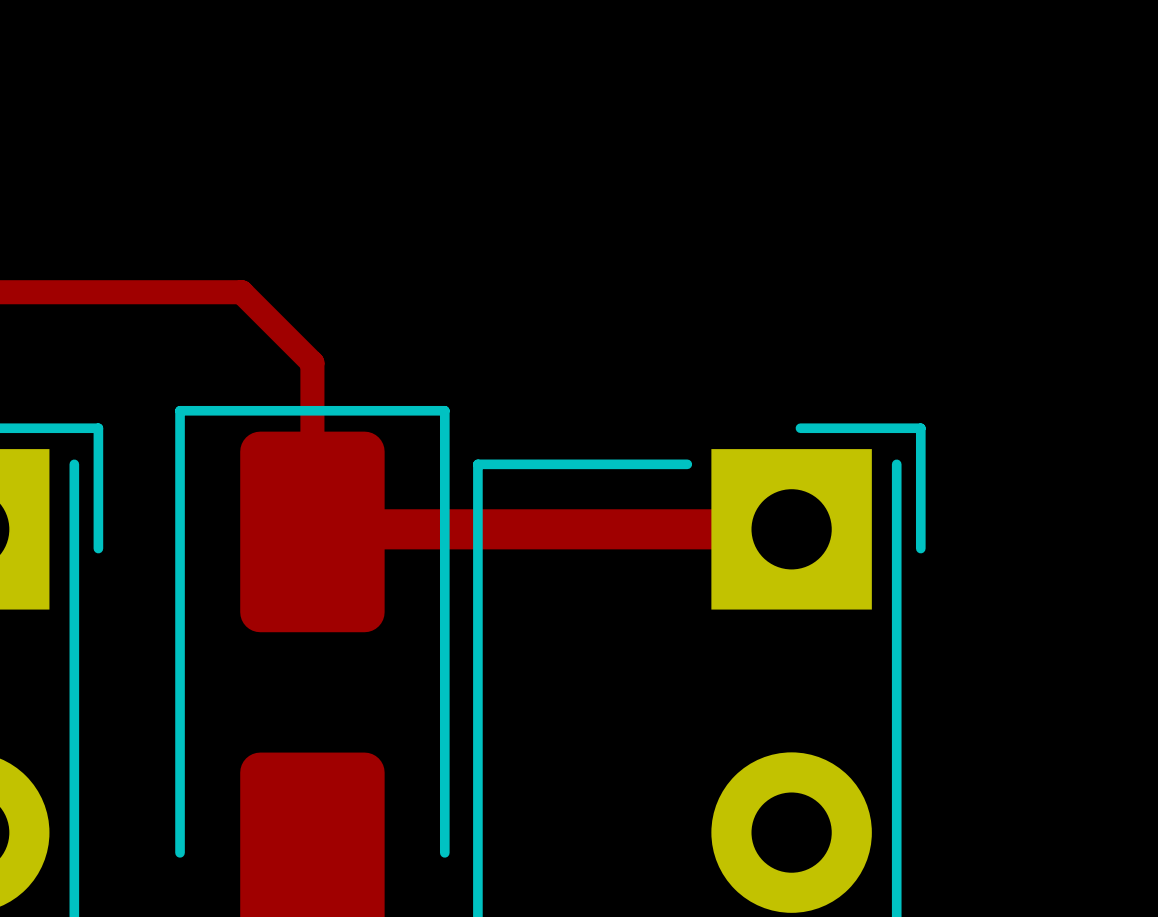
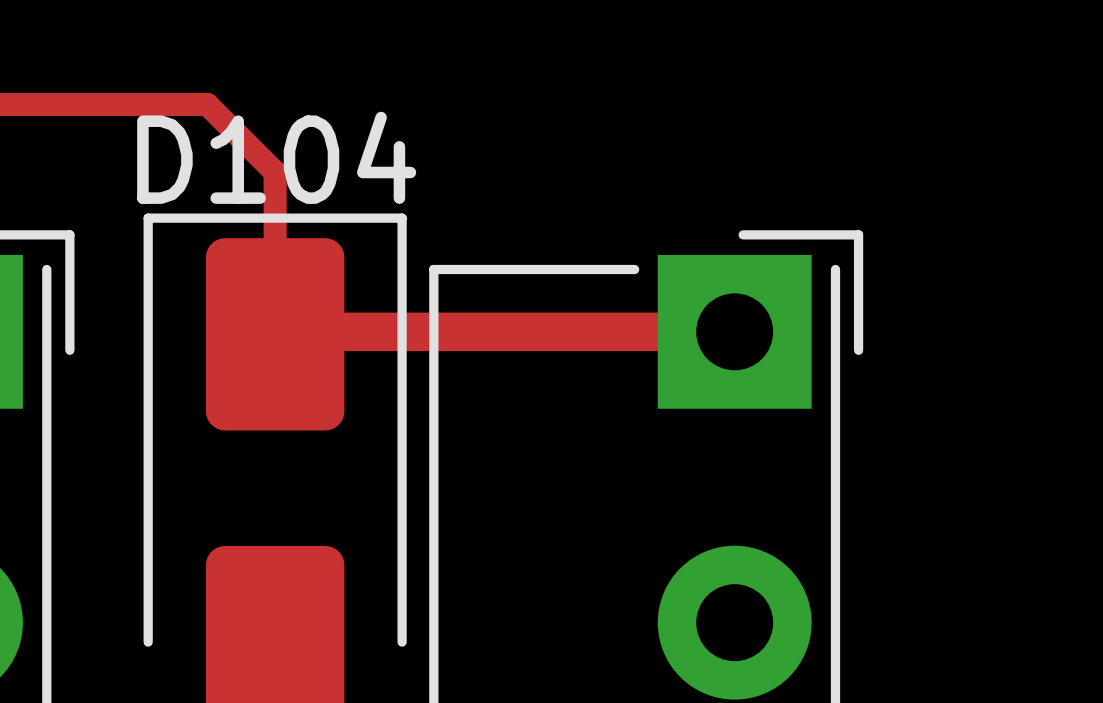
D104 name: none -> D104 (276, 157)

